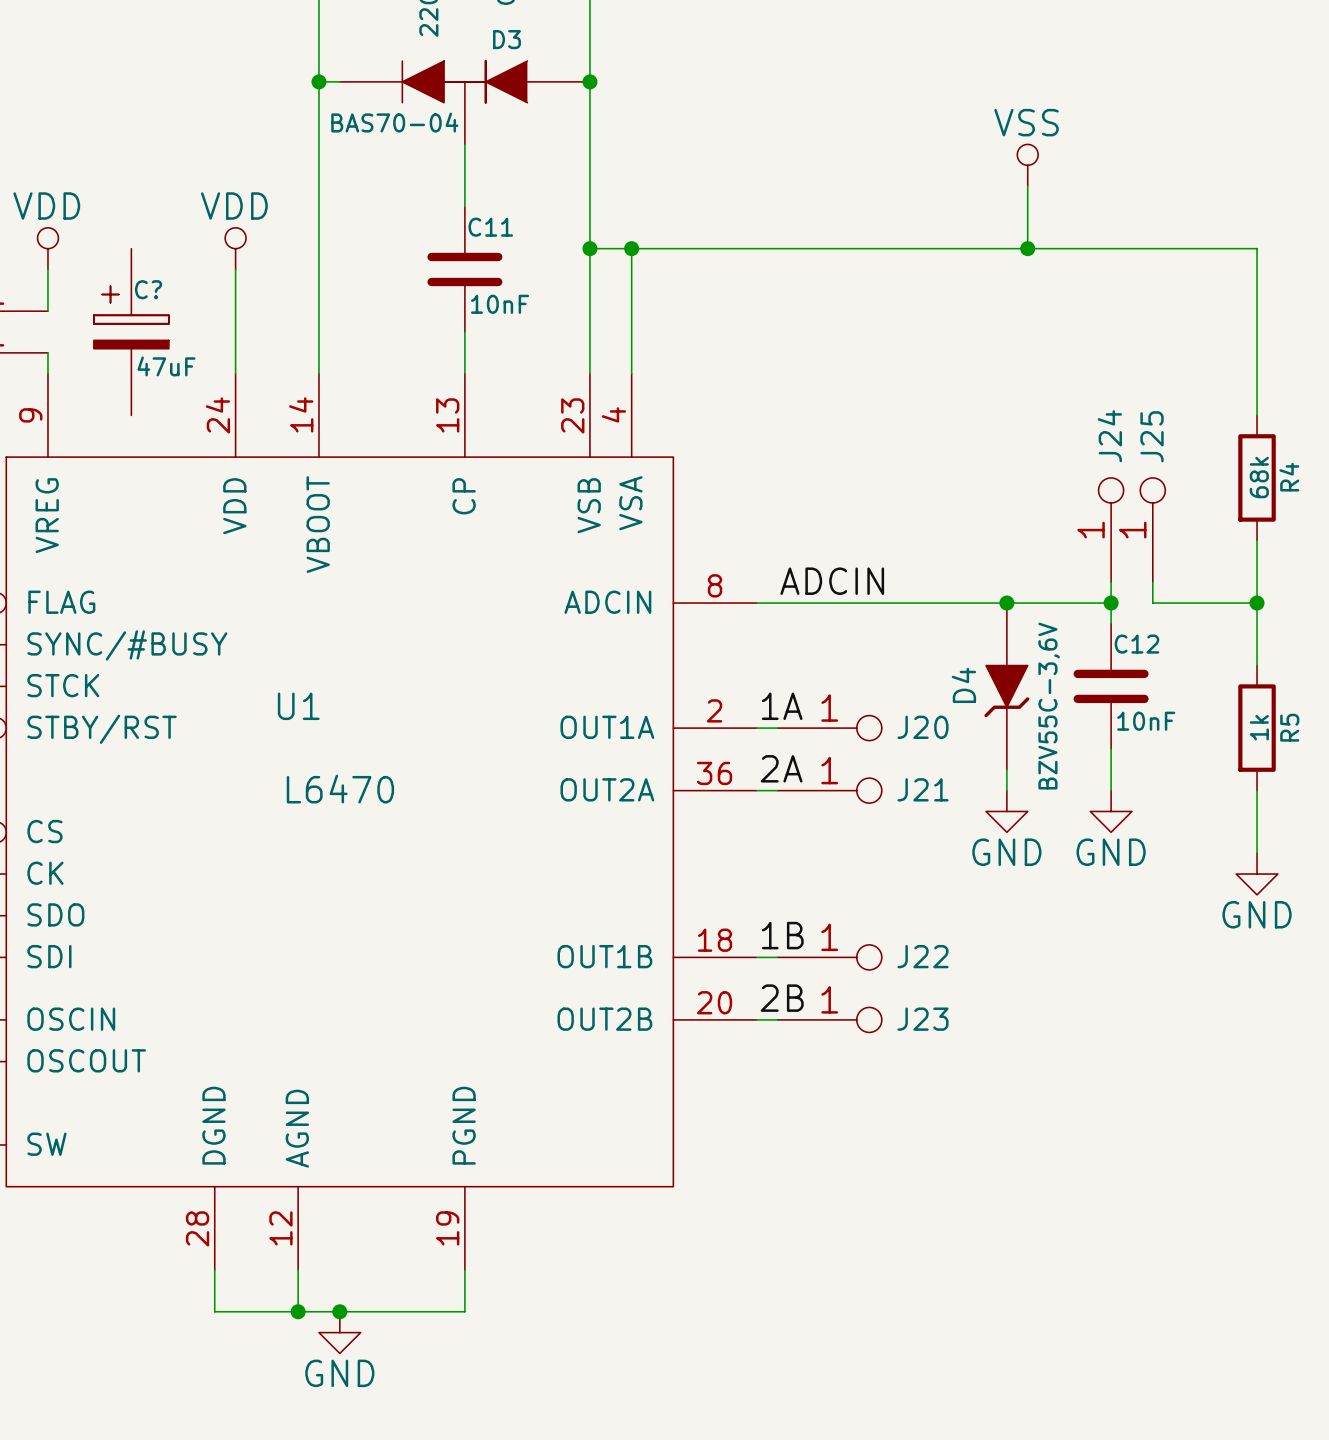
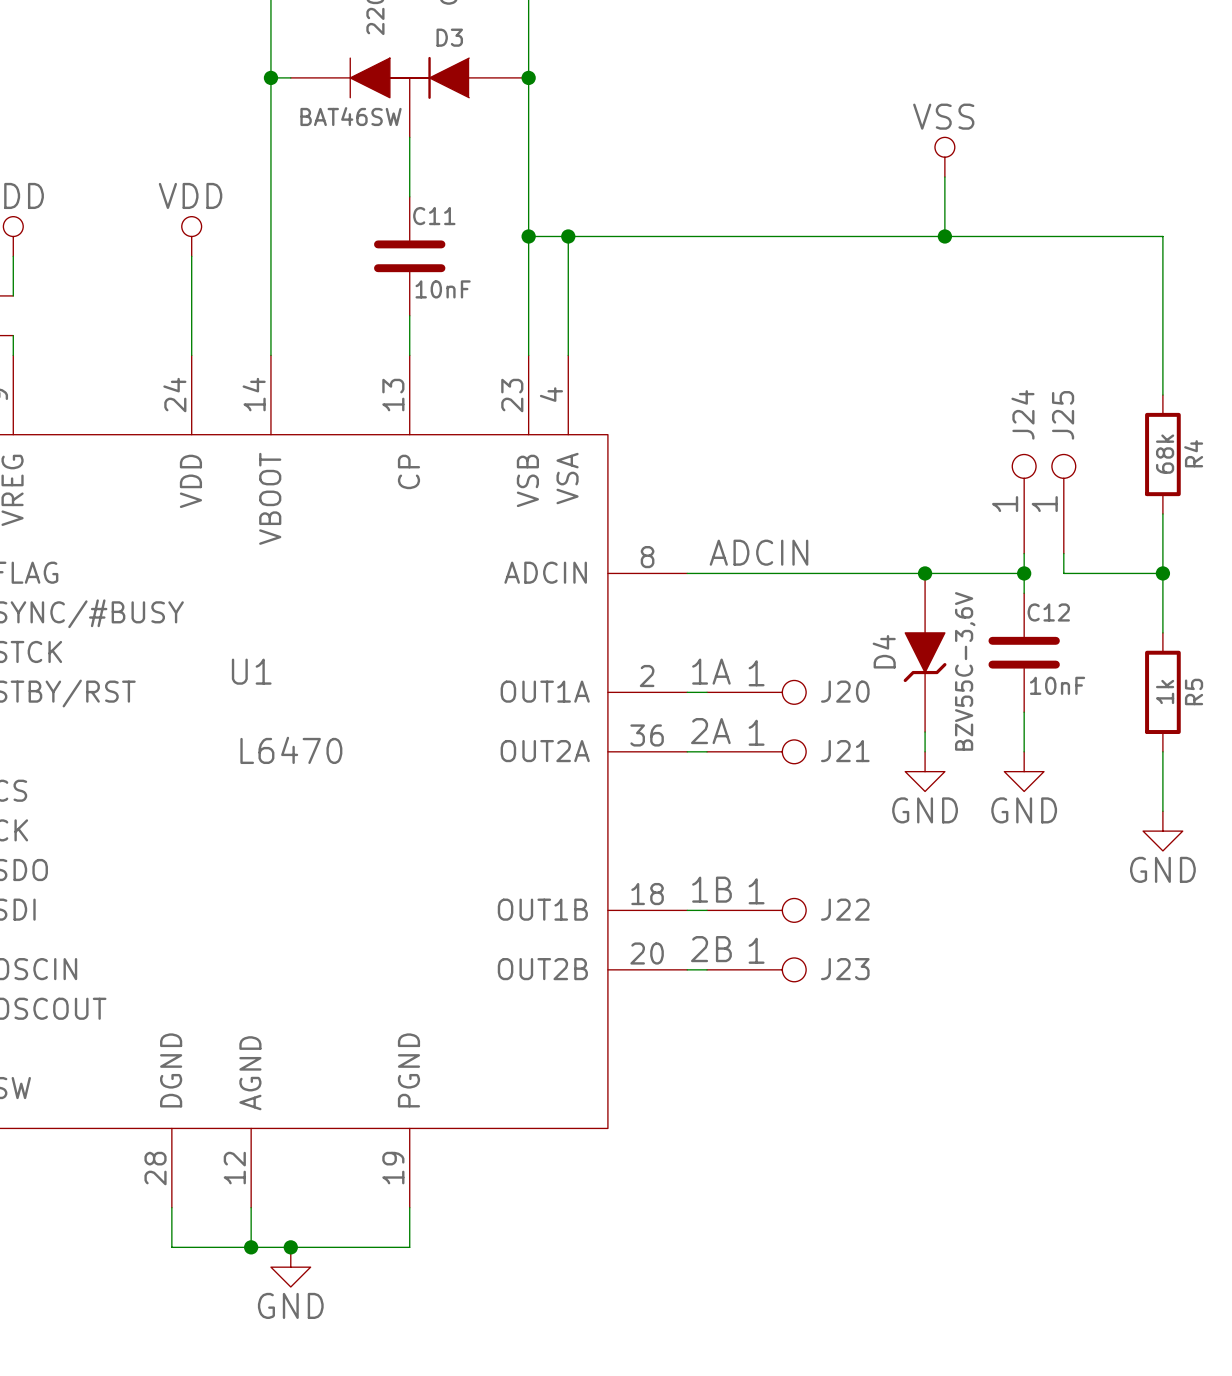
D3 value: BAS70-04 (394, 122) -> BAT46SW (351, 116)
C?: 47uF (131, 332) -> none

